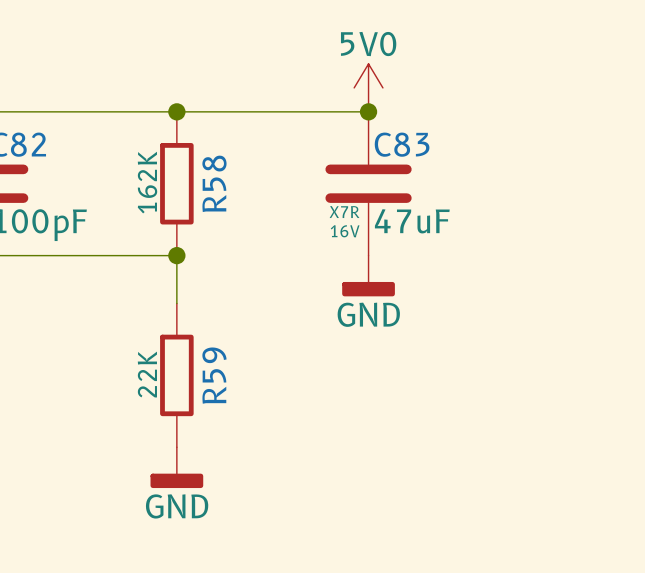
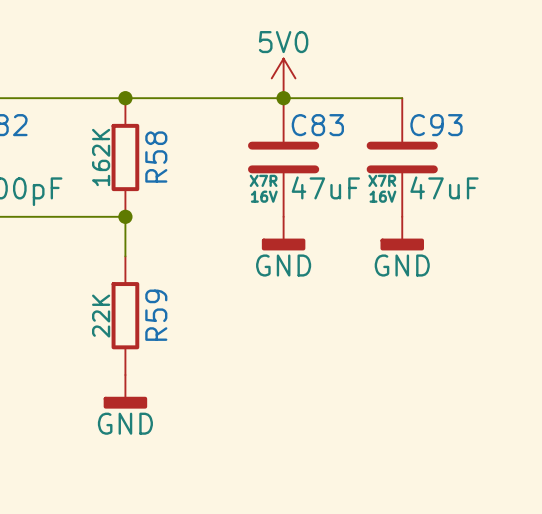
wire: none -> (283, 98) (402, 98)
C93: none -> 47uF (402, 157)
power symbol: none -> GND (402, 233)

